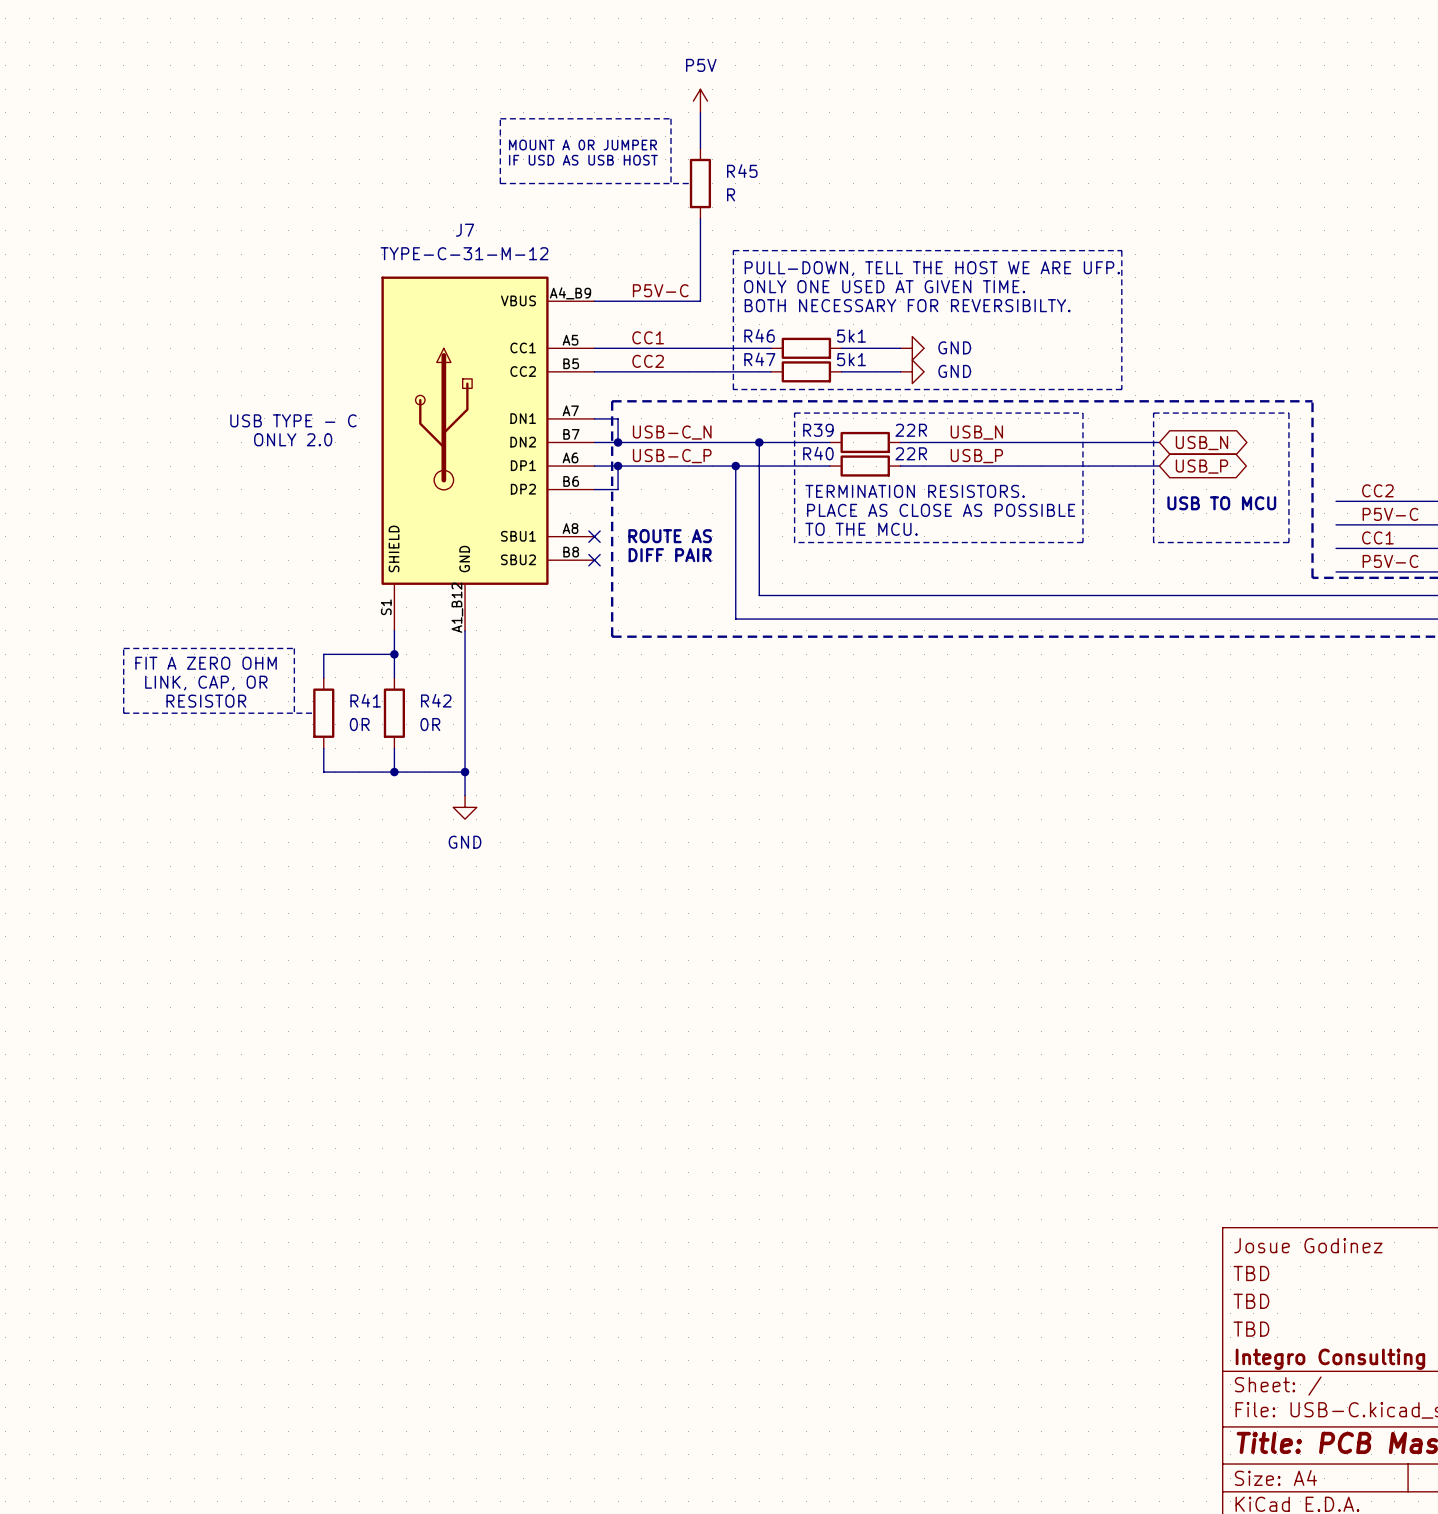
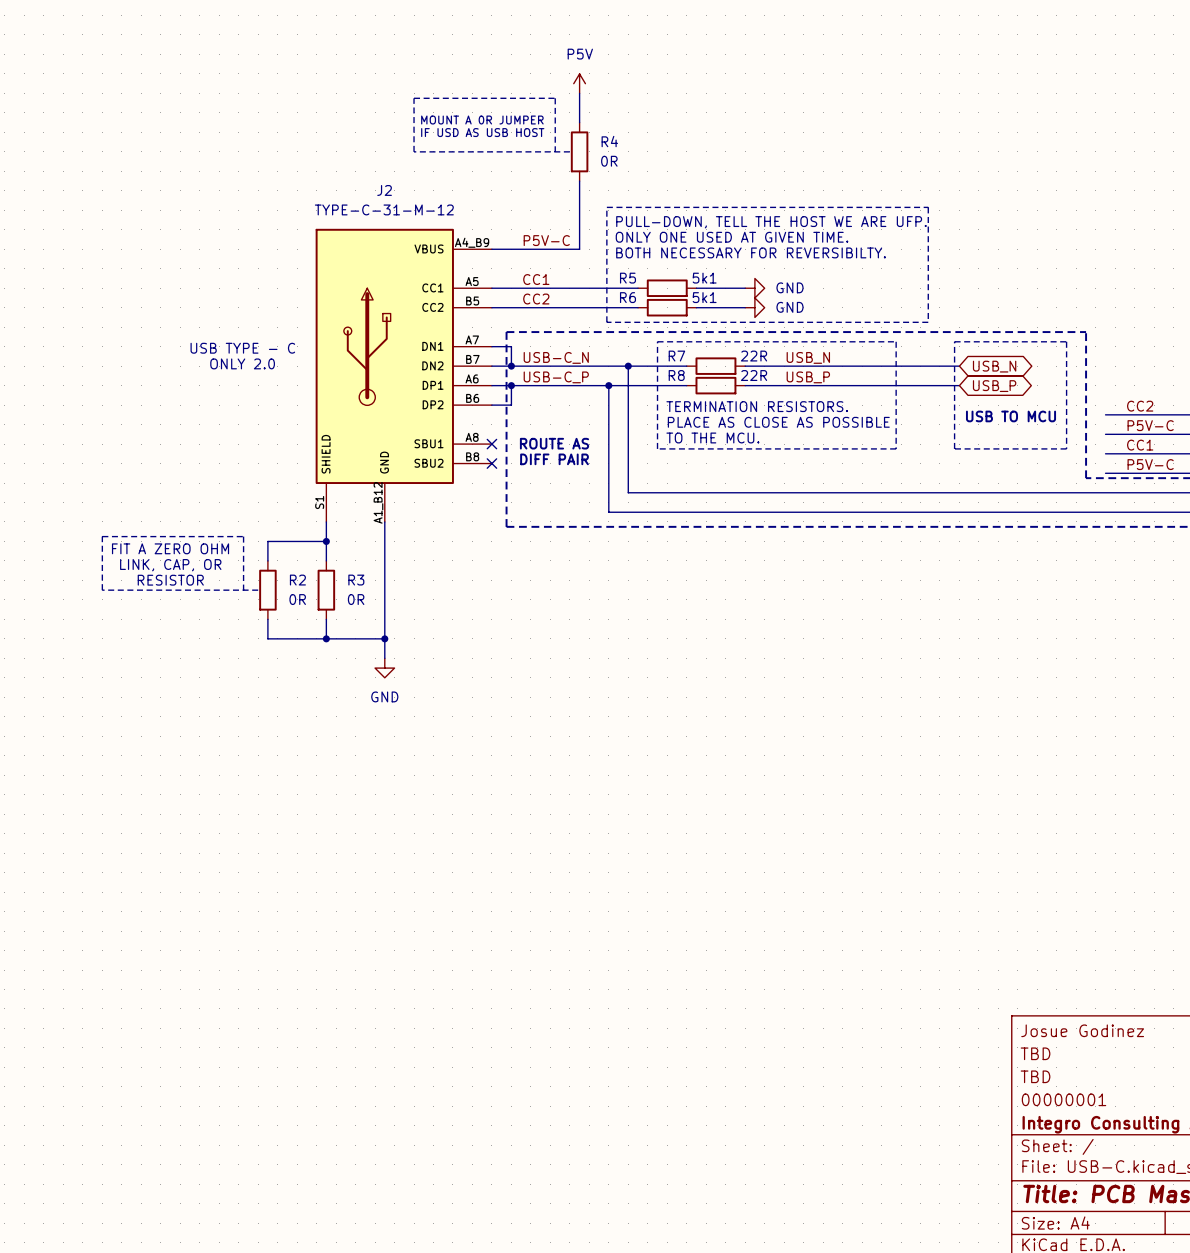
R45 name: R45 (742, 171) -> R4 (609, 141)
R45 value: R (731, 194) -> 0R (609, 161)
J7 name: J7 (465, 230) -> J2 (384, 190)
R46 name: R46 (759, 335) -> R5 (627, 278)
R47 name: R47 (759, 359) -> R6 (627, 297)
R39 name: R39 (818, 430) -> R7 (676, 356)
R40 name: R40 (818, 453) -> R8 (676, 375)
R41 name: R41 (365, 700) -> R2 (297, 580)
R42 name: R42 (436, 700) -> R3 (356, 580)
title block: TBD (1251, 1329) -> 00000001 (1064, 1099)

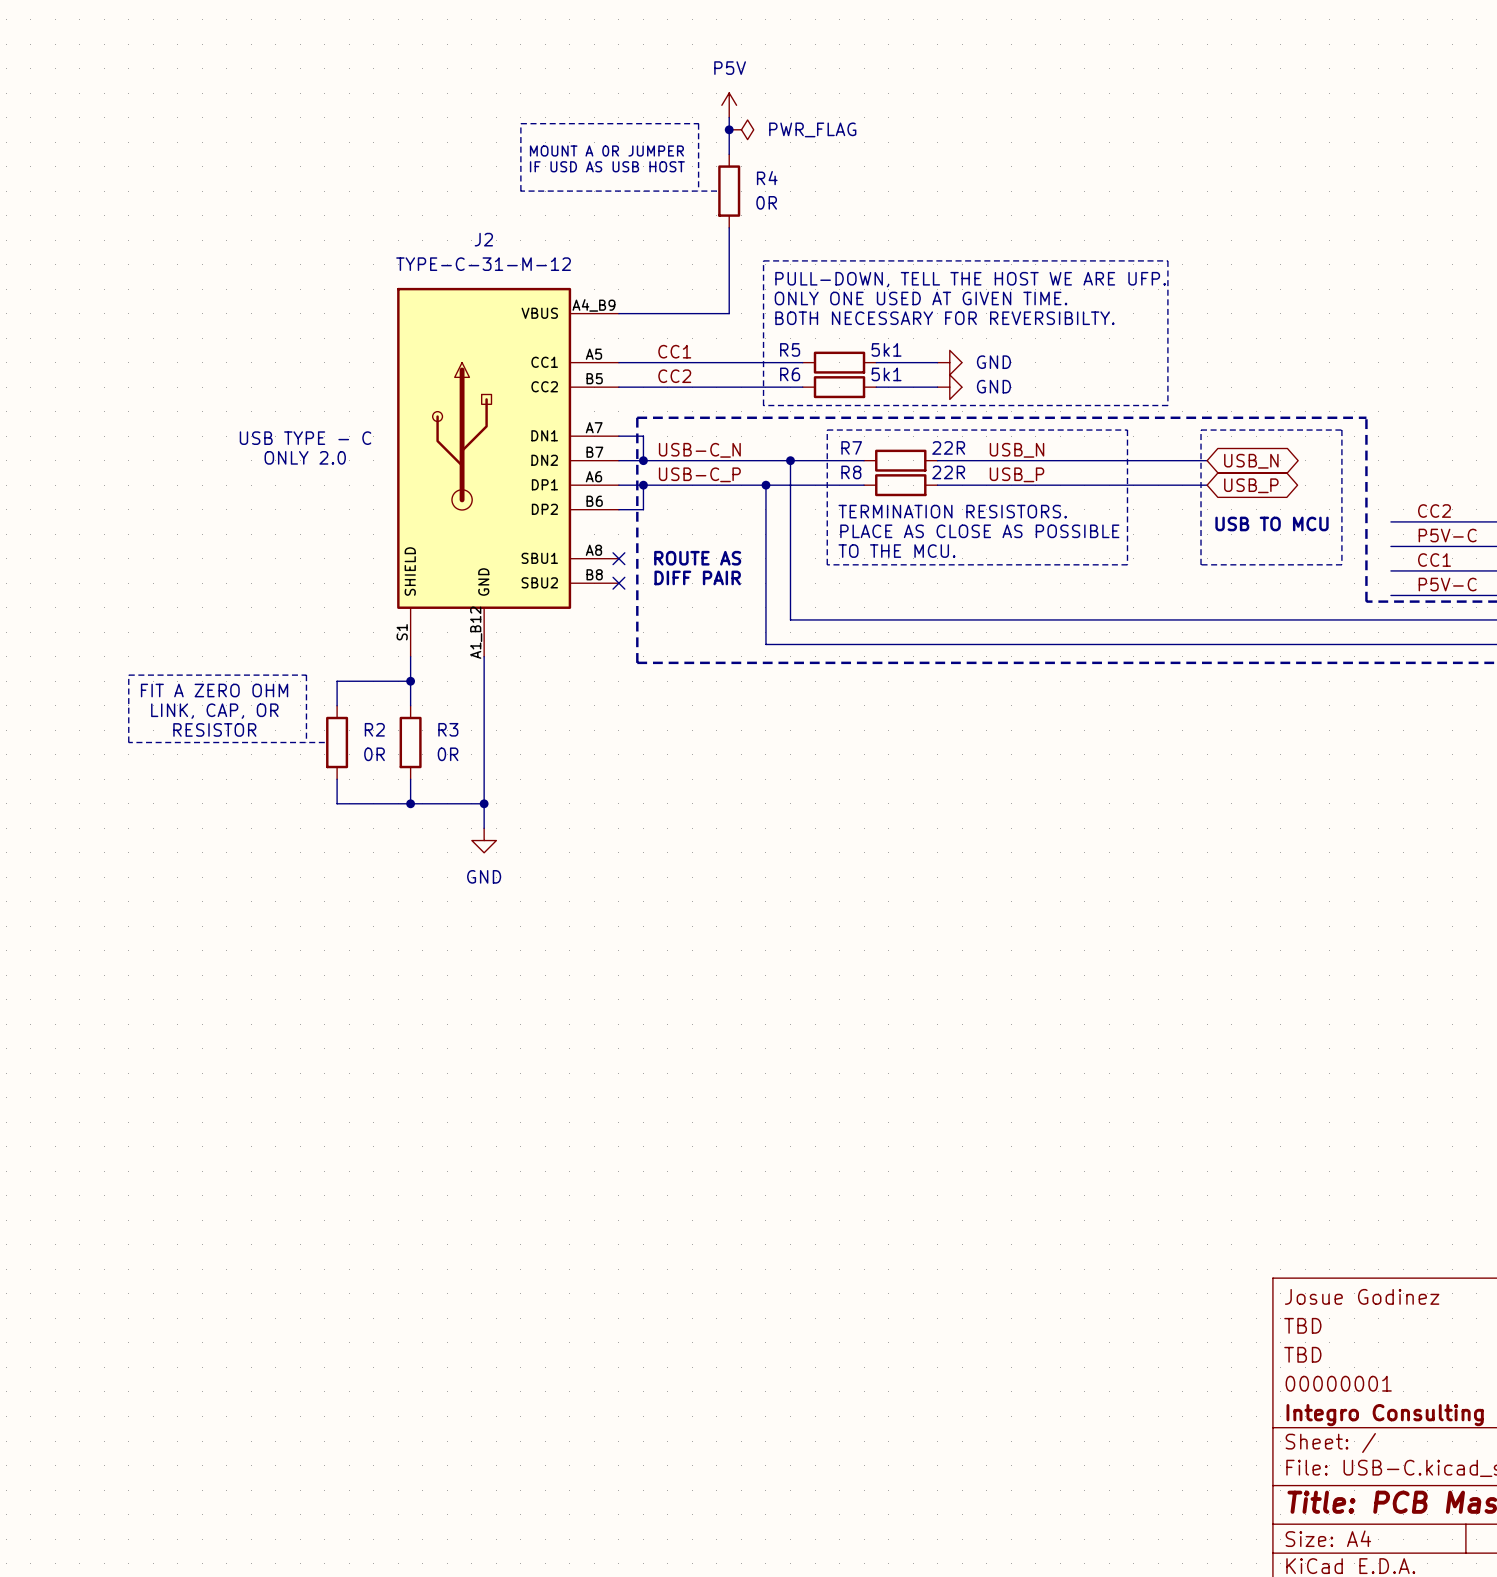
junction: none -> (729, 129)
power symbol: none -> PWR_FLAG (741, 129)
label: P5V-C (546, 240) -> none

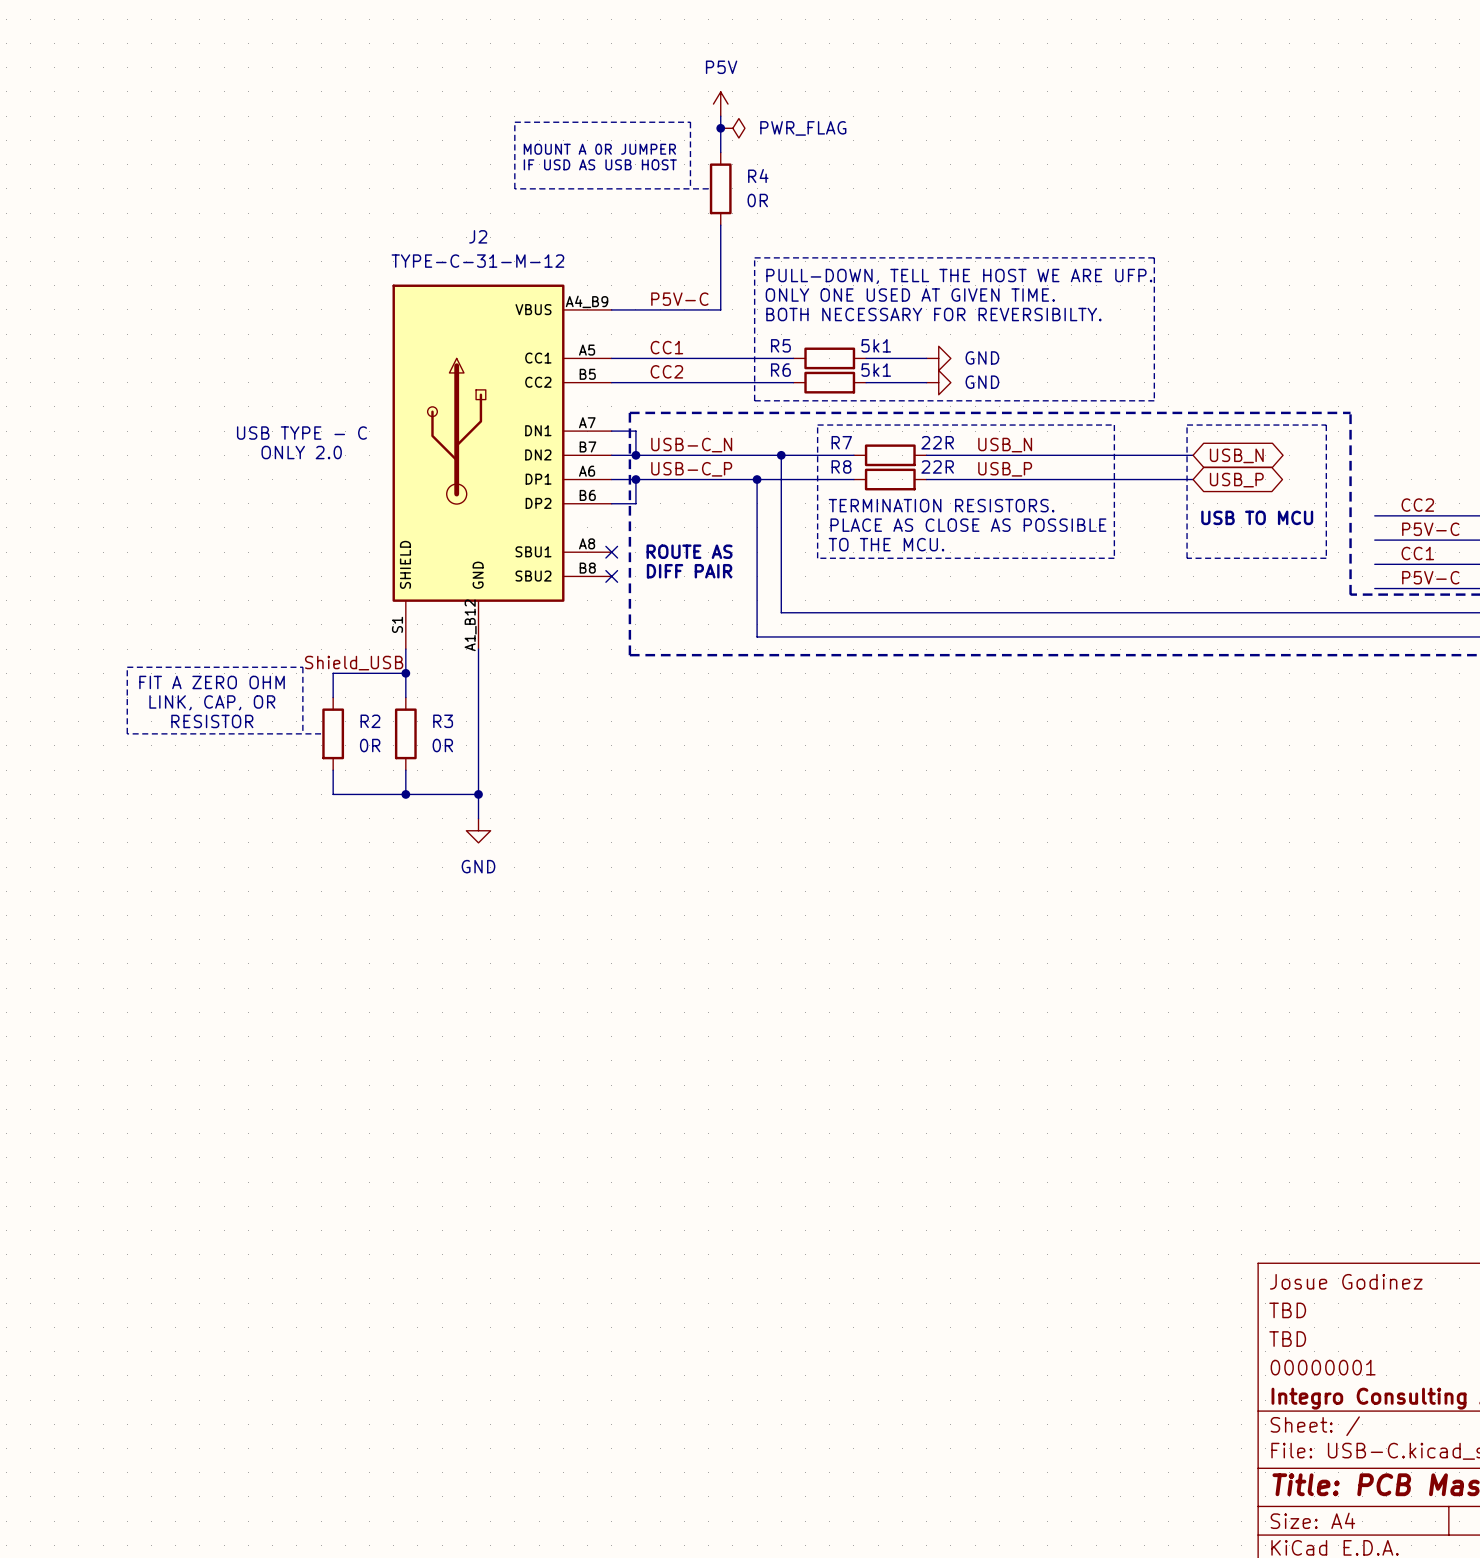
label: none -> P5V-C (679, 299)
label: none -> Shield_USB (354, 663)

